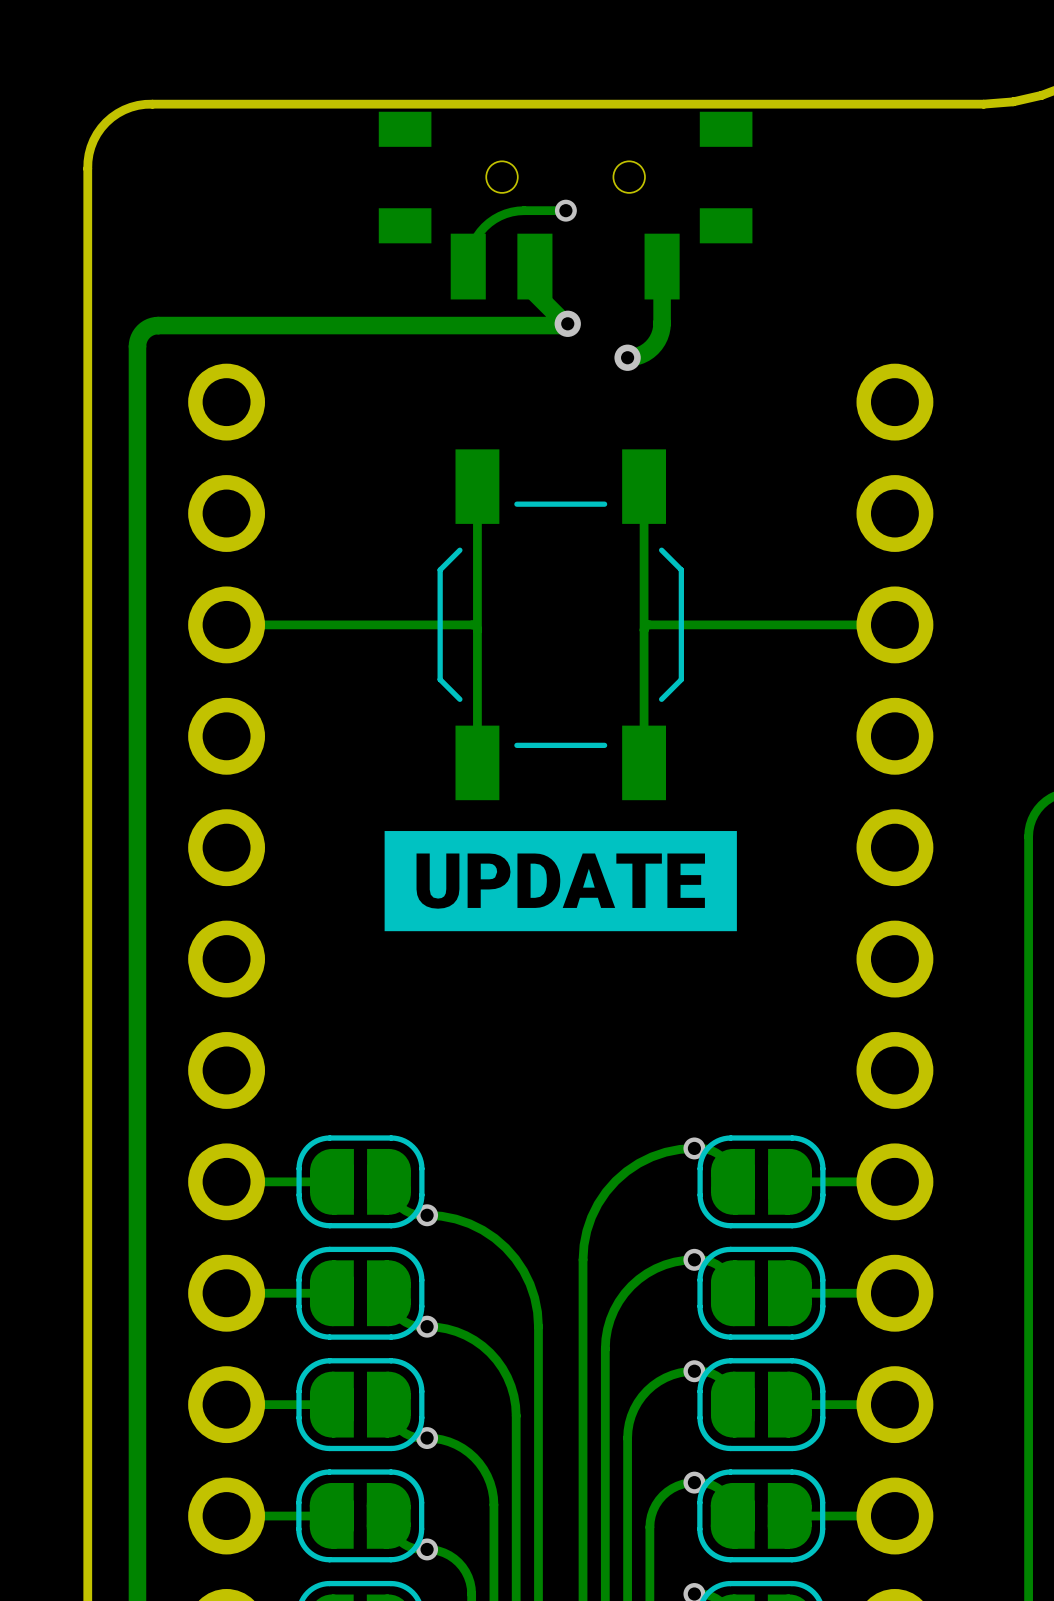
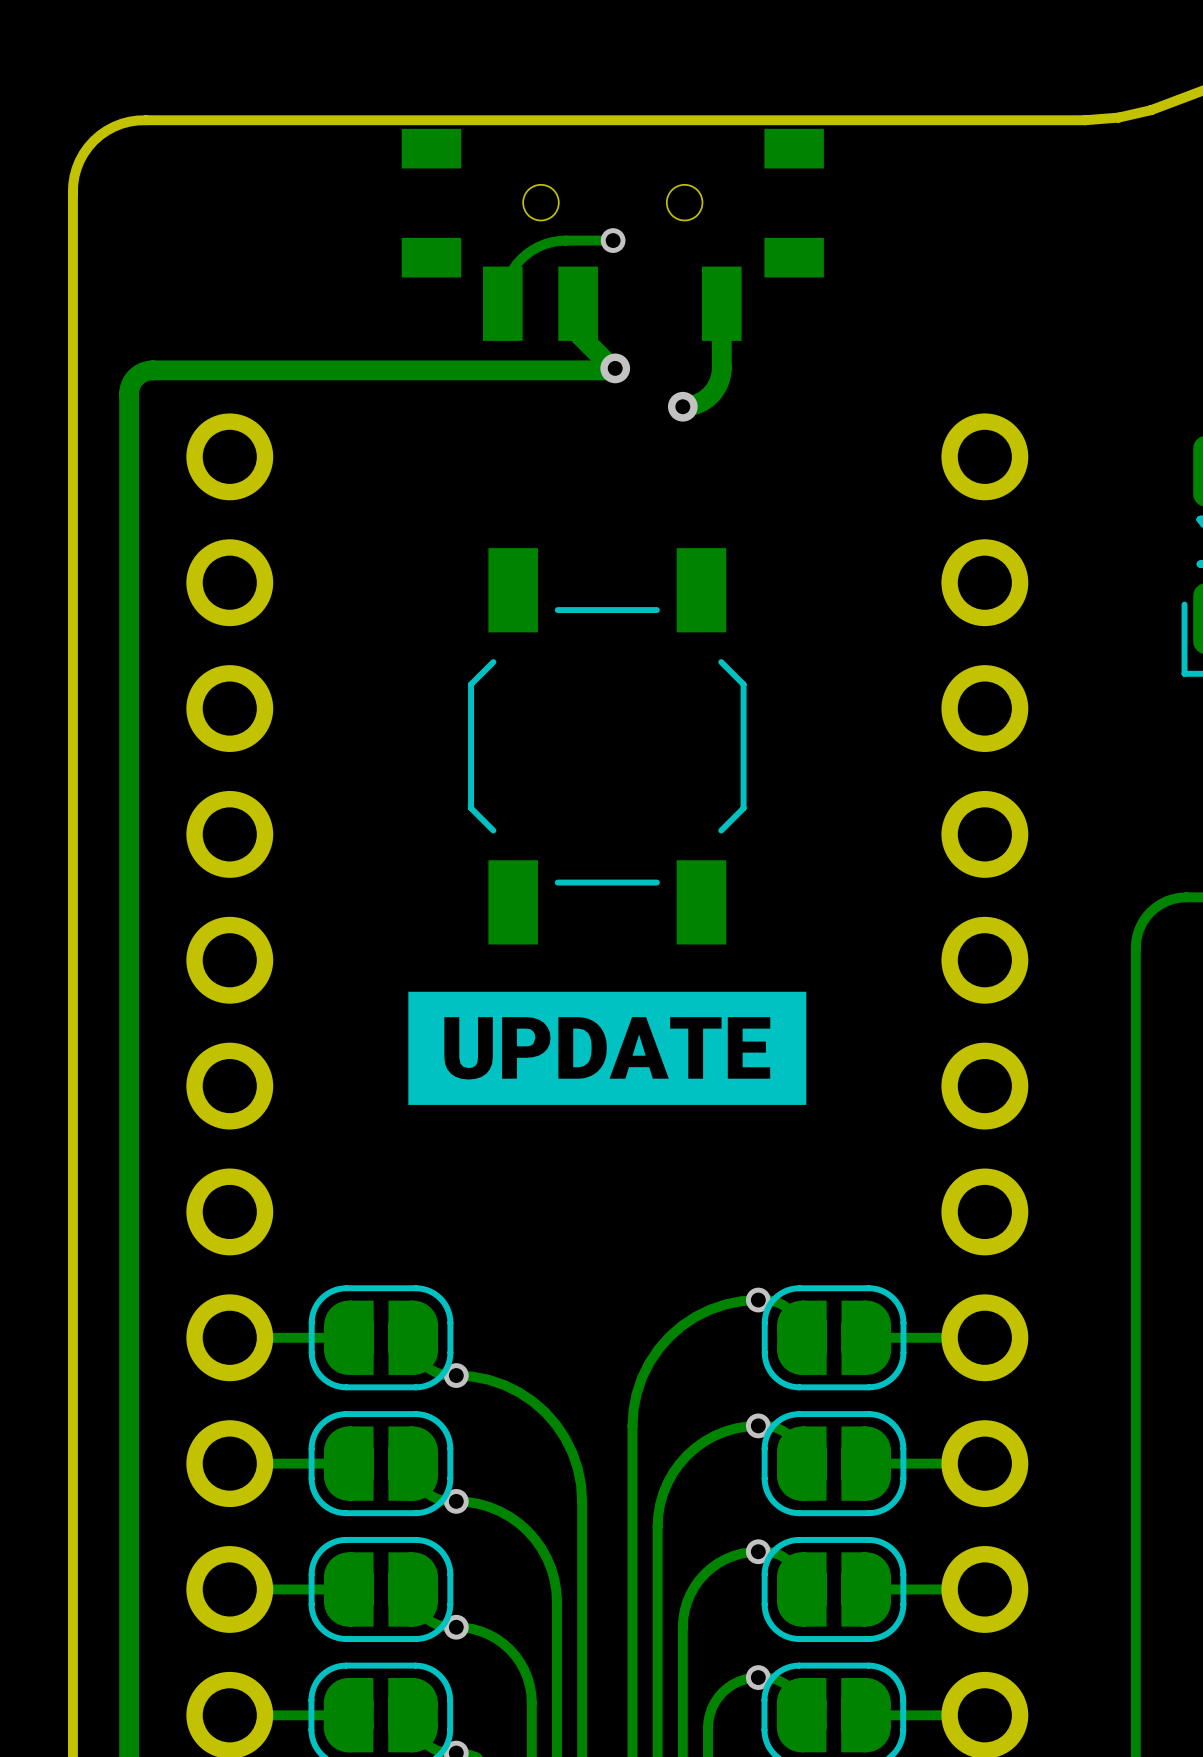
track: (477, 486) (477, 762) -> none
track: (644, 486) (644, 762) -> none
track: (226, 624) (472, 624) (475, 626) (477, 630) -> none
part position: (560, 624) -> (607, 746)
track: (894, 624) (649, 624) (645, 626) (644, 630) -> none
drawing position: (560, 881) -> (607, 1048)

